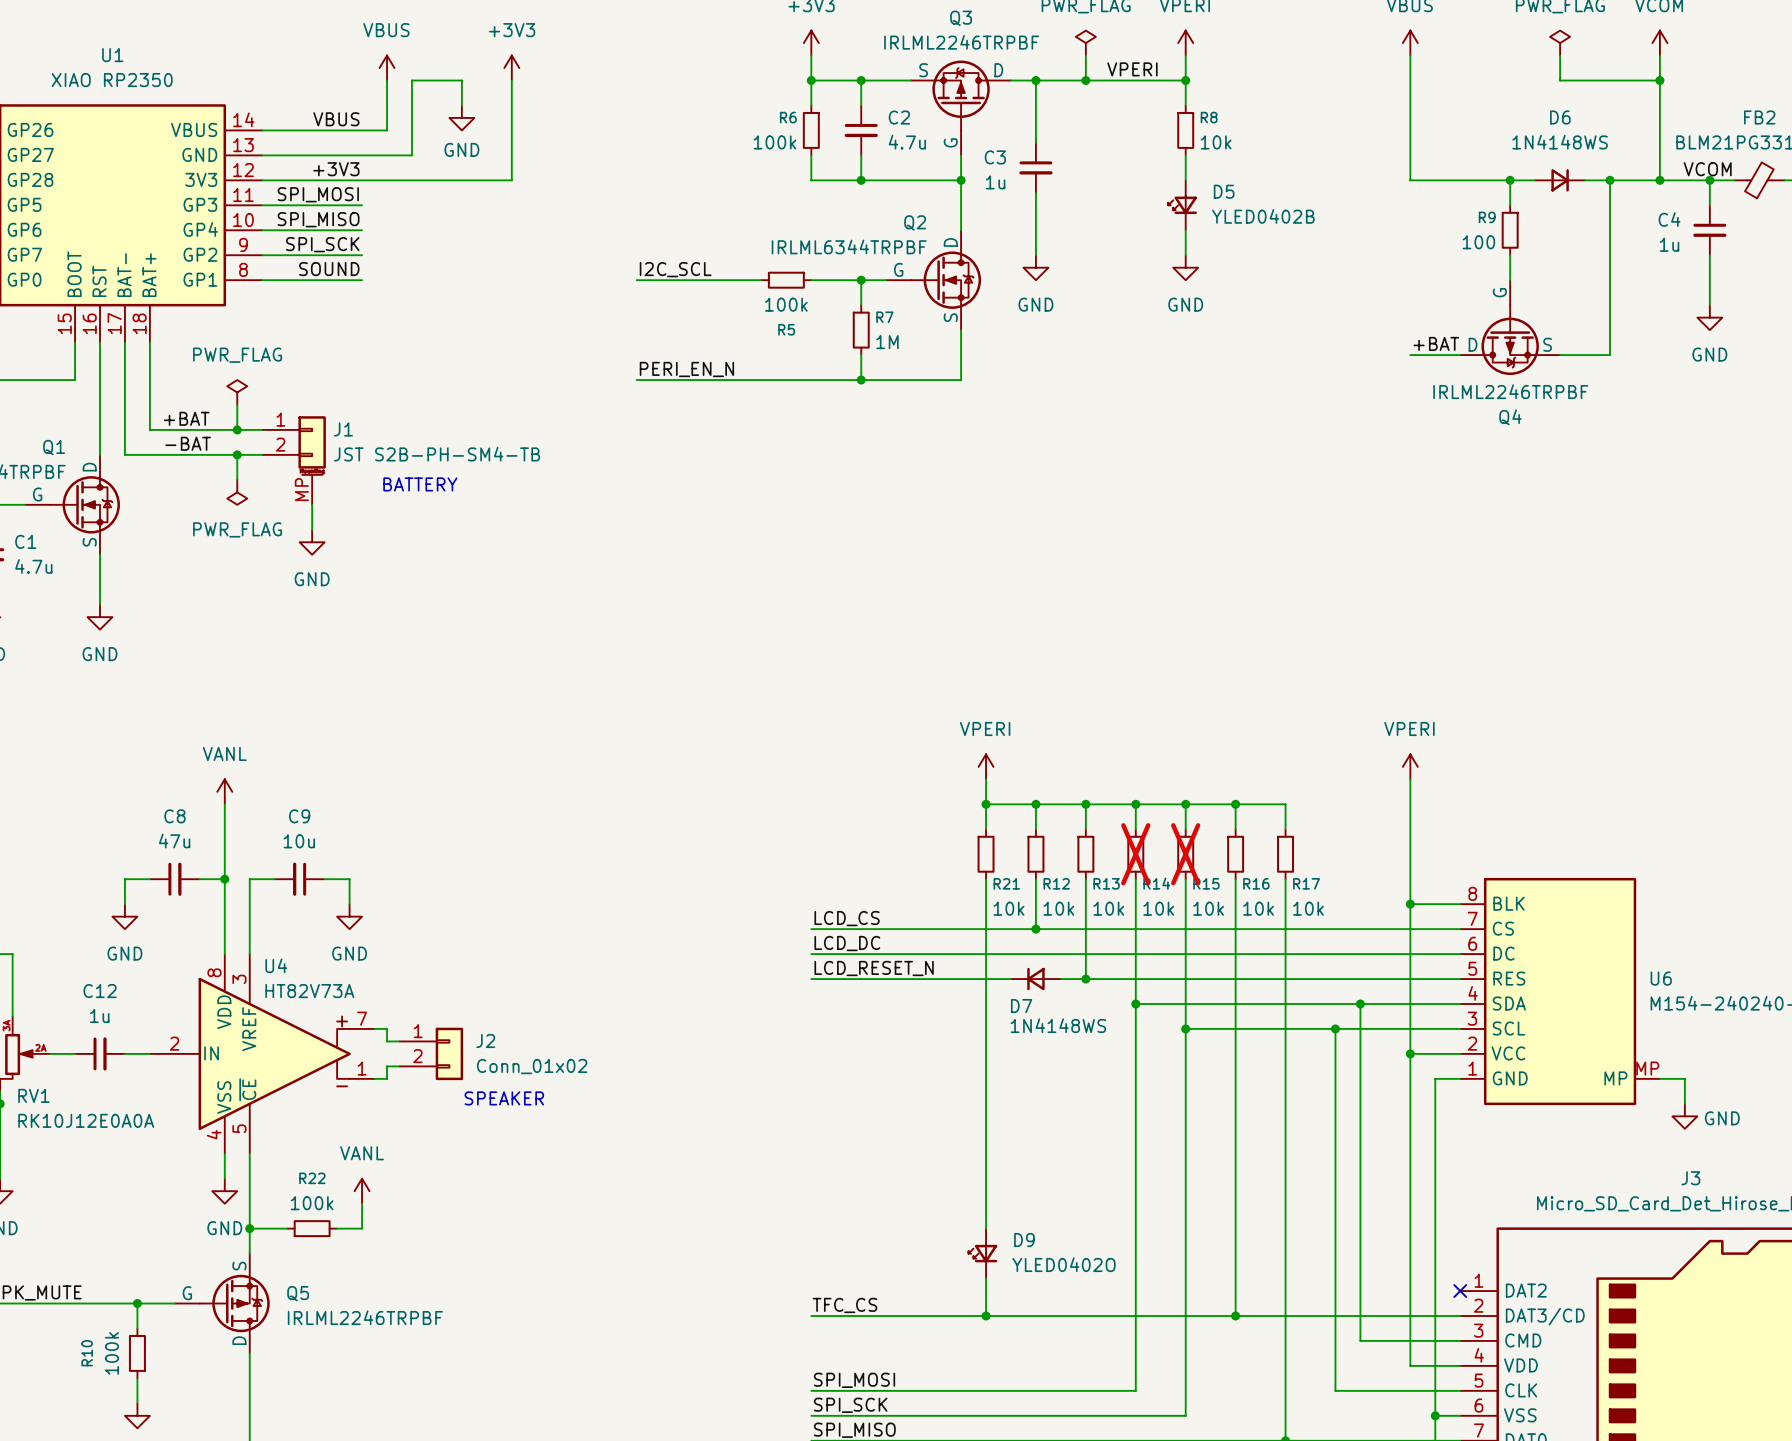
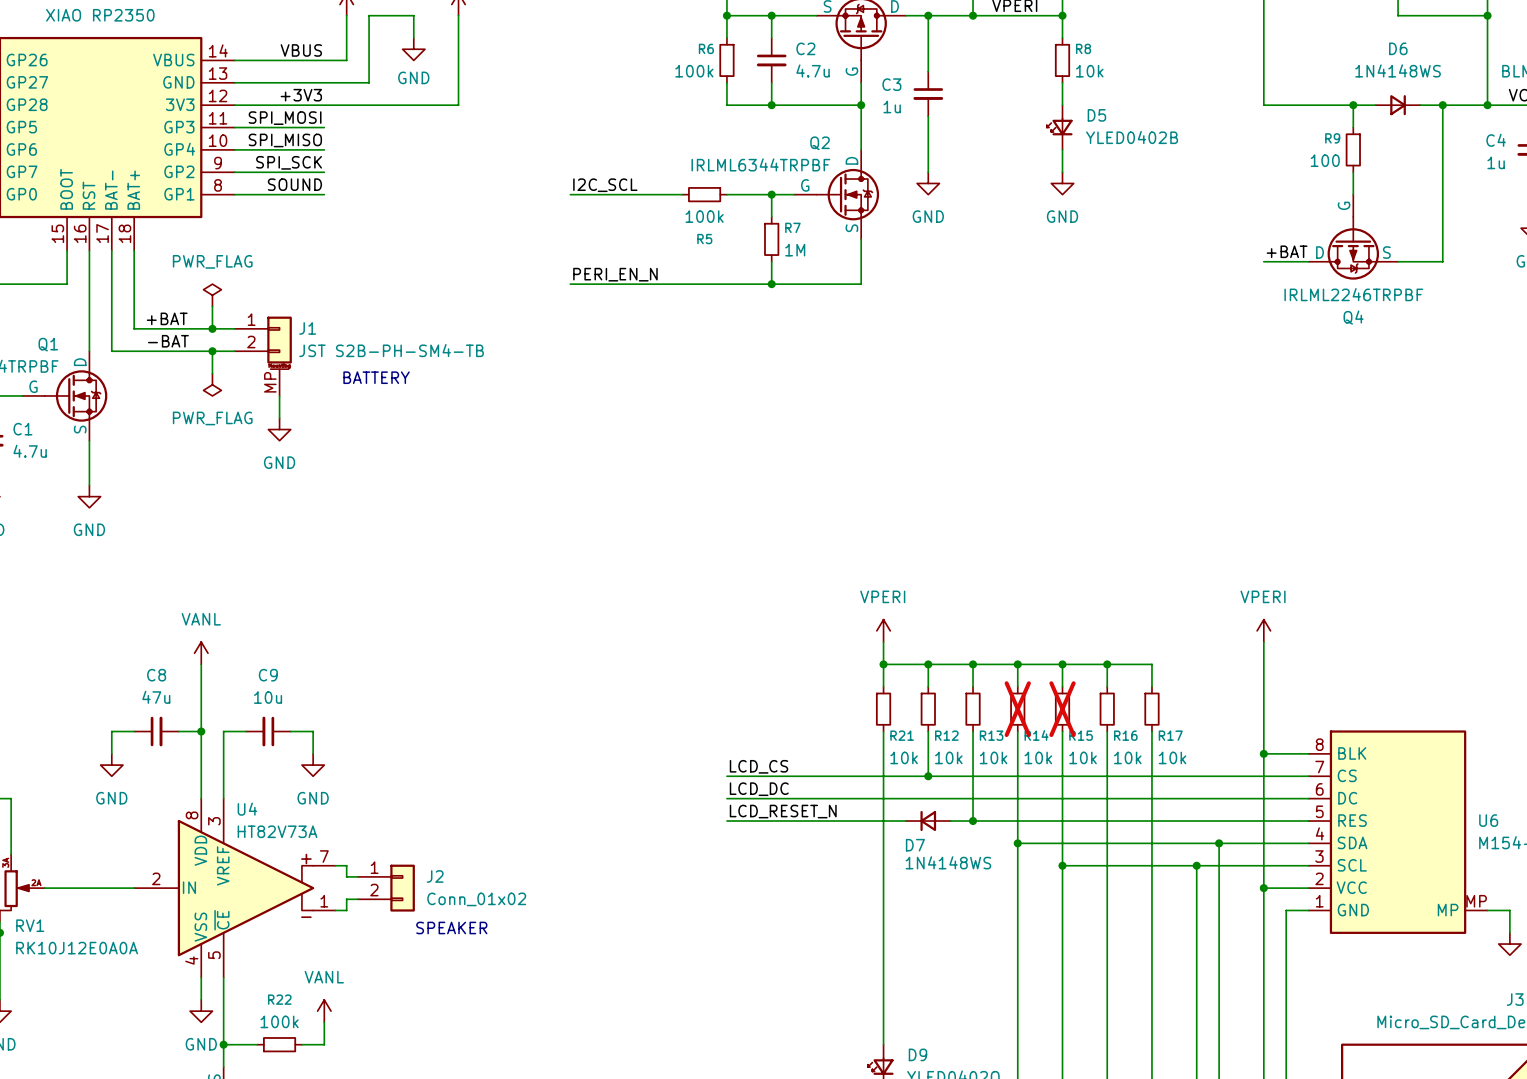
C12: 1u (99, 1053) -> none

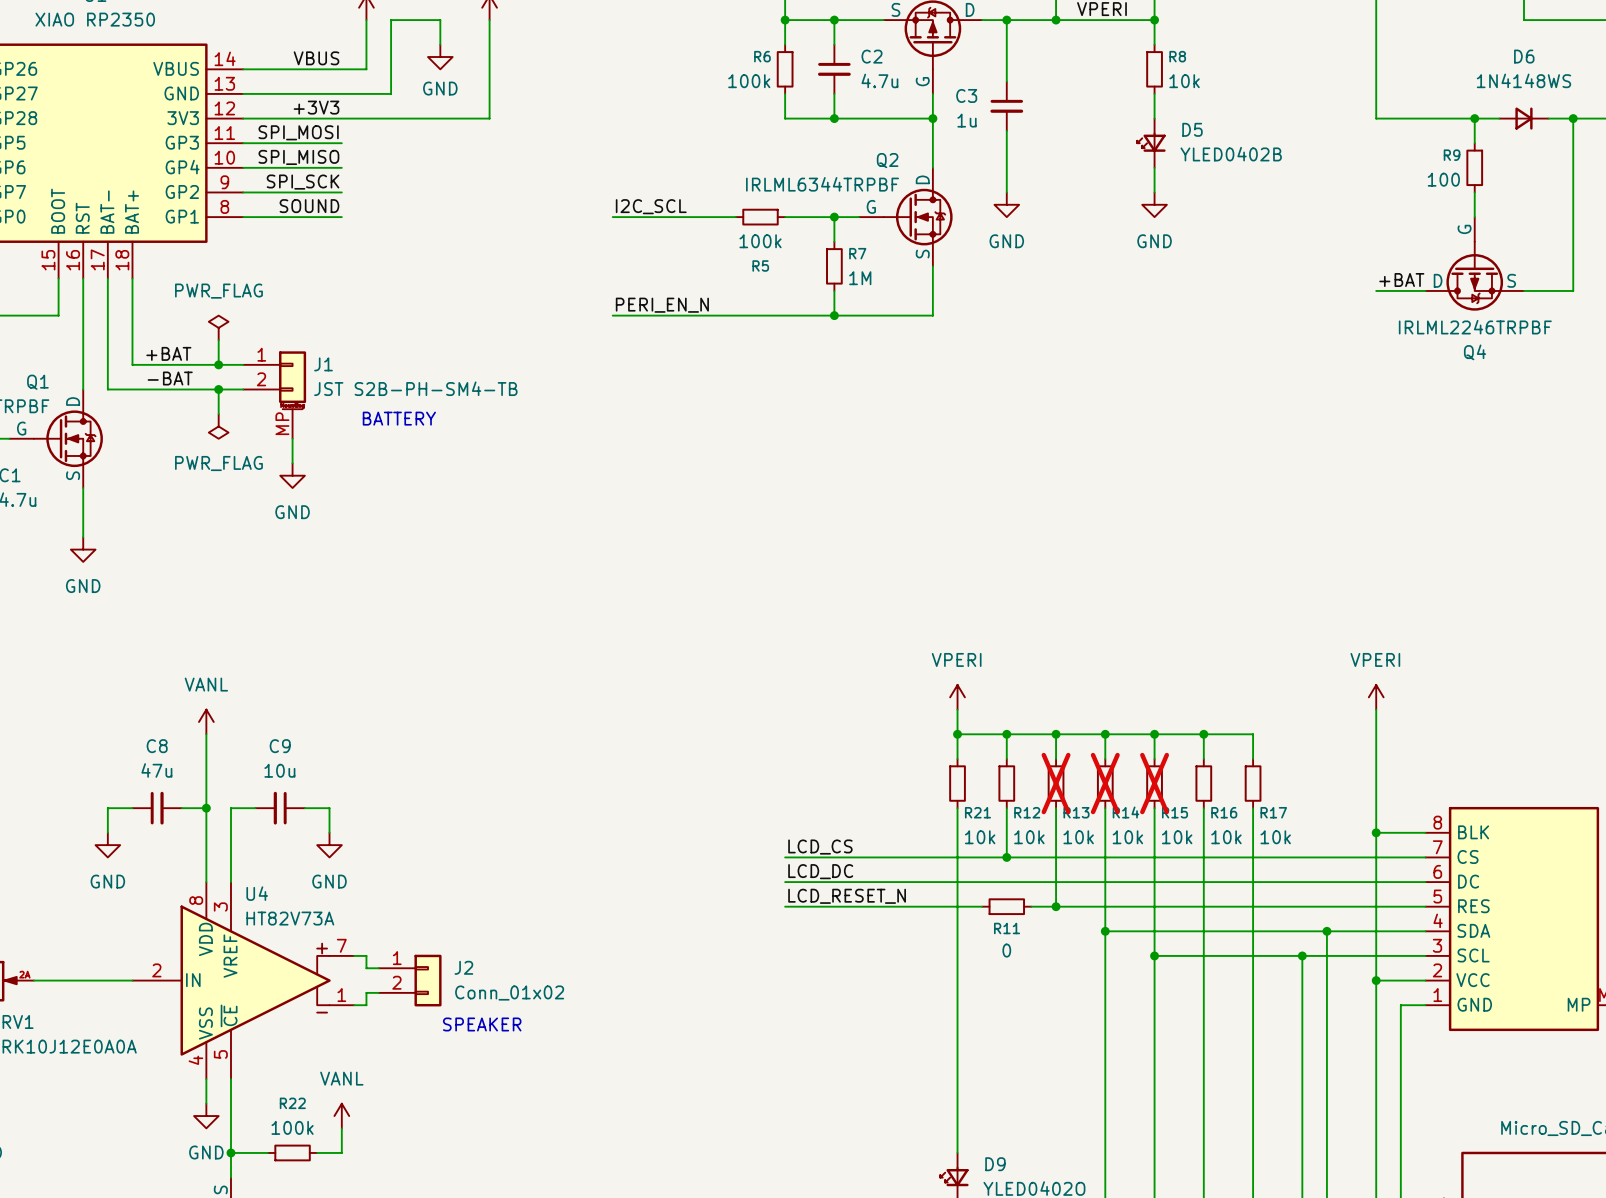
R13 do-not-place cross: none -> (1056, 783)
D7: 1N4148WS (928, 821) -> none
R11: none -> 0 (1006, 906)

